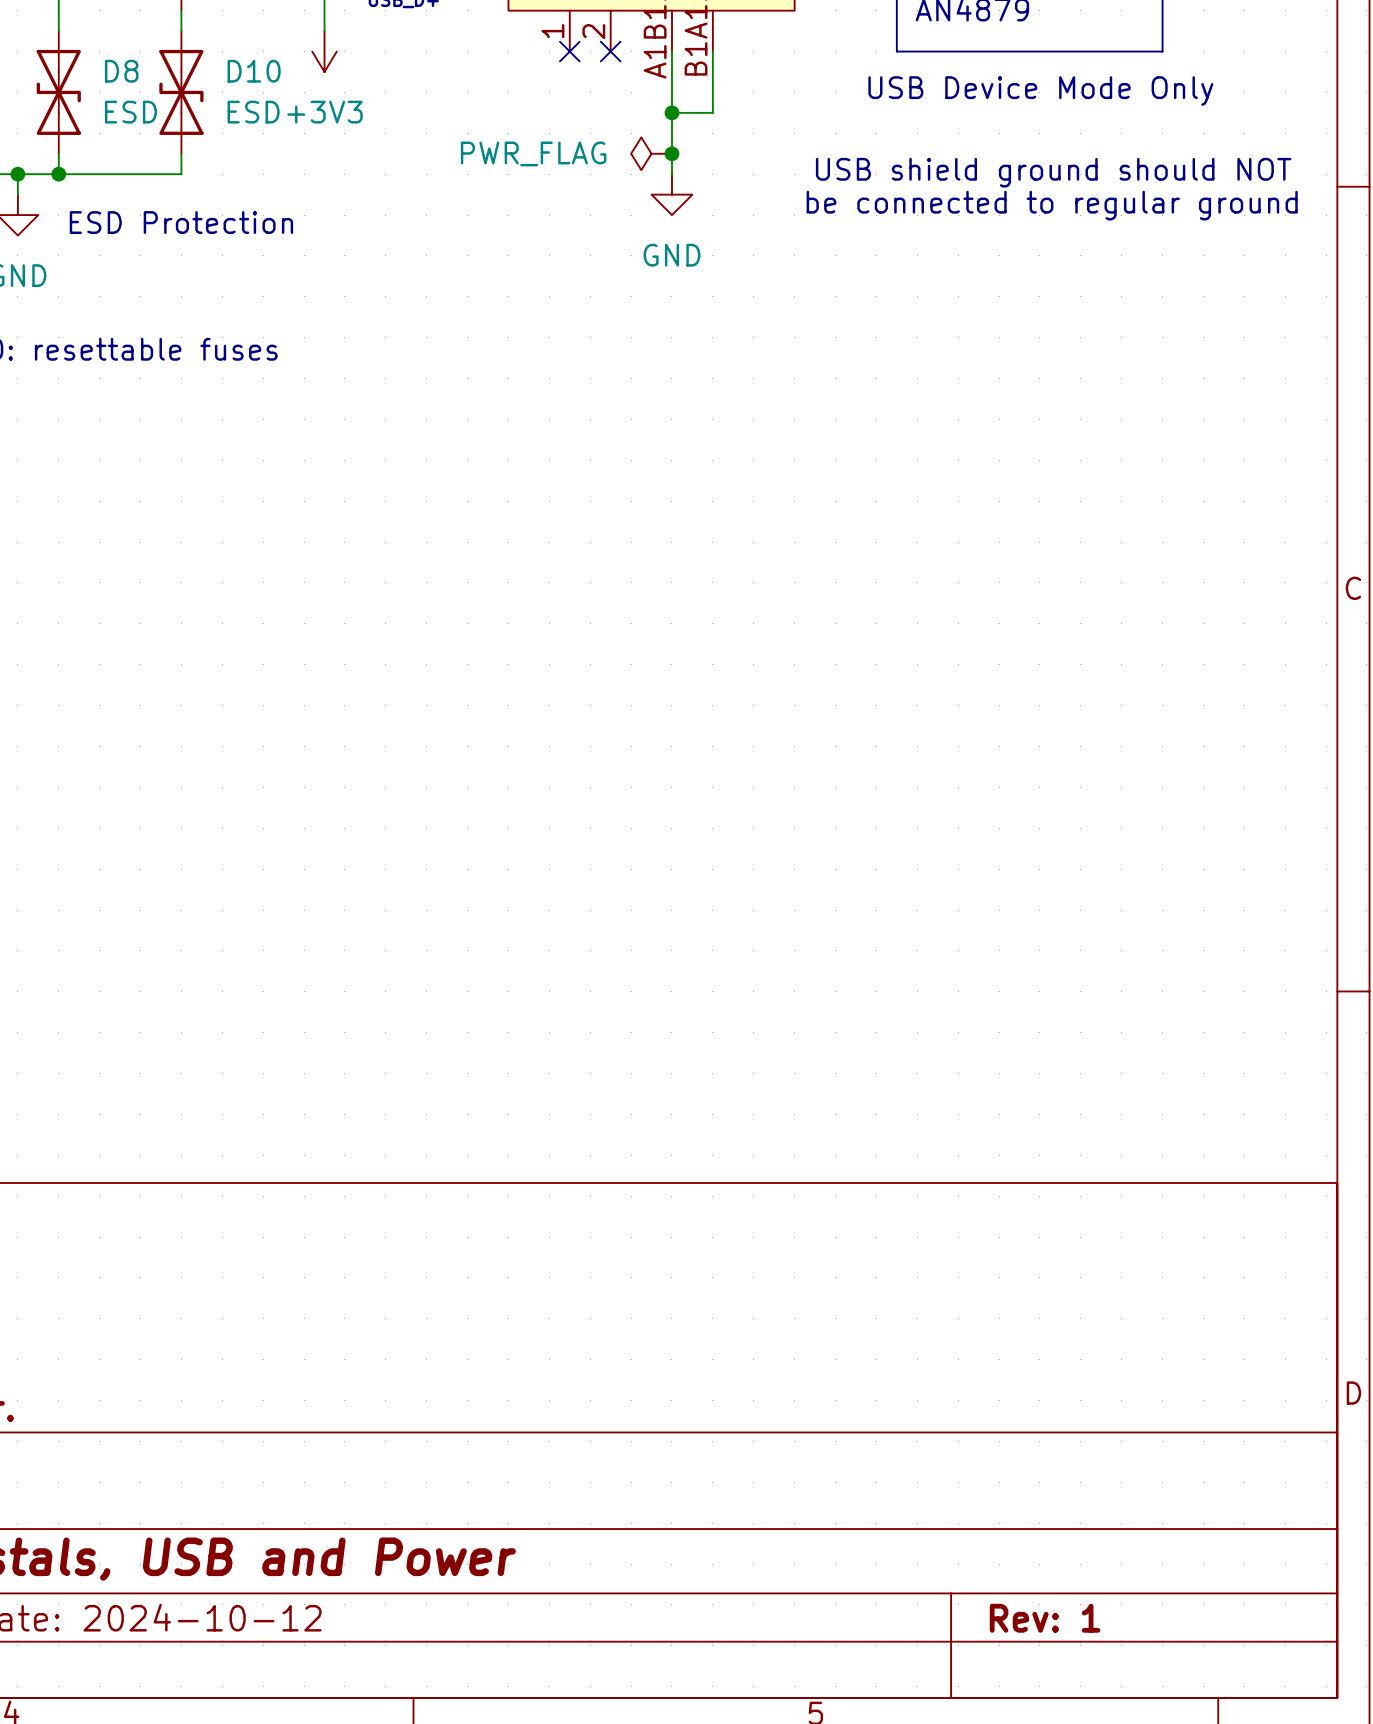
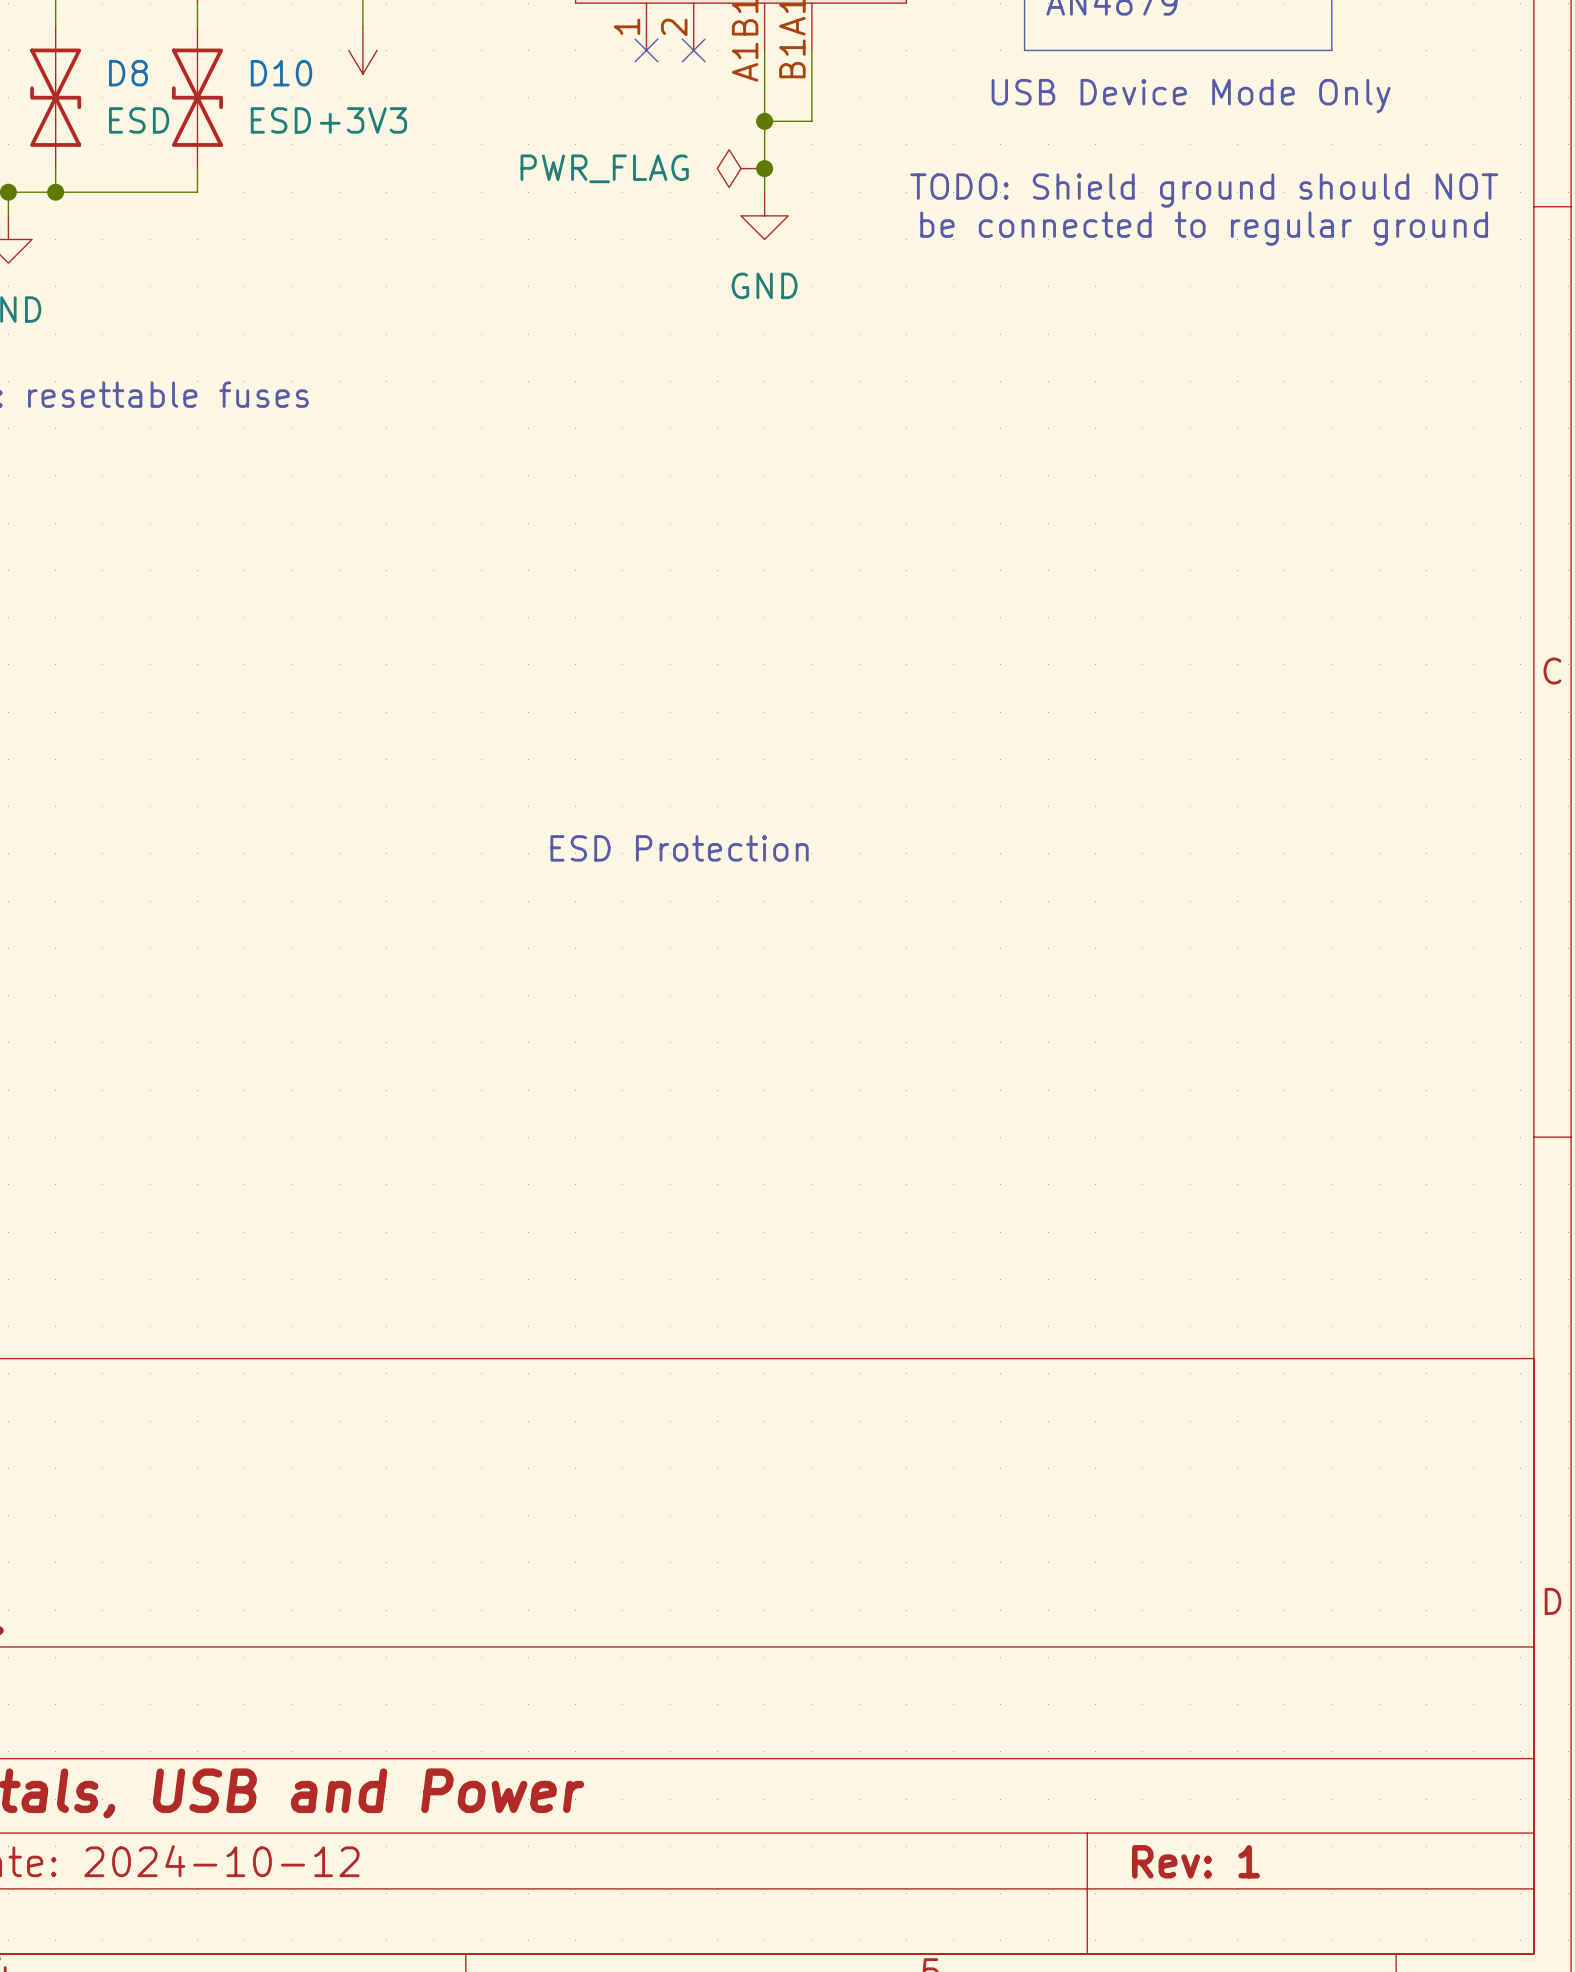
text: USB shield ground should NOT (1053, 172) -> TODO: Shield ground should NOT (1204, 190)
text: ESD Protection (181, 222) -> none
text: none -> ESD Protection (679, 848)

